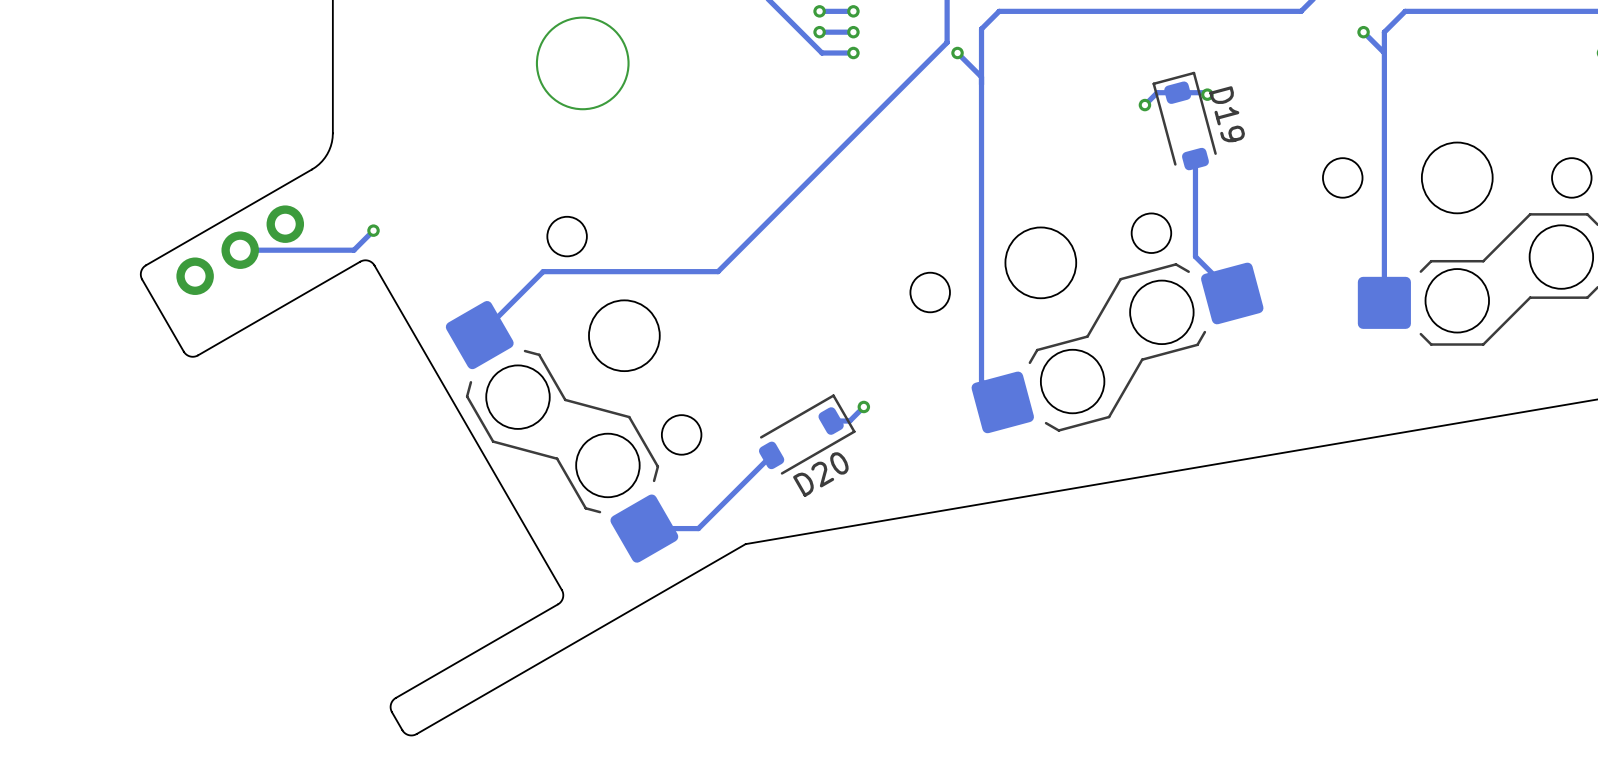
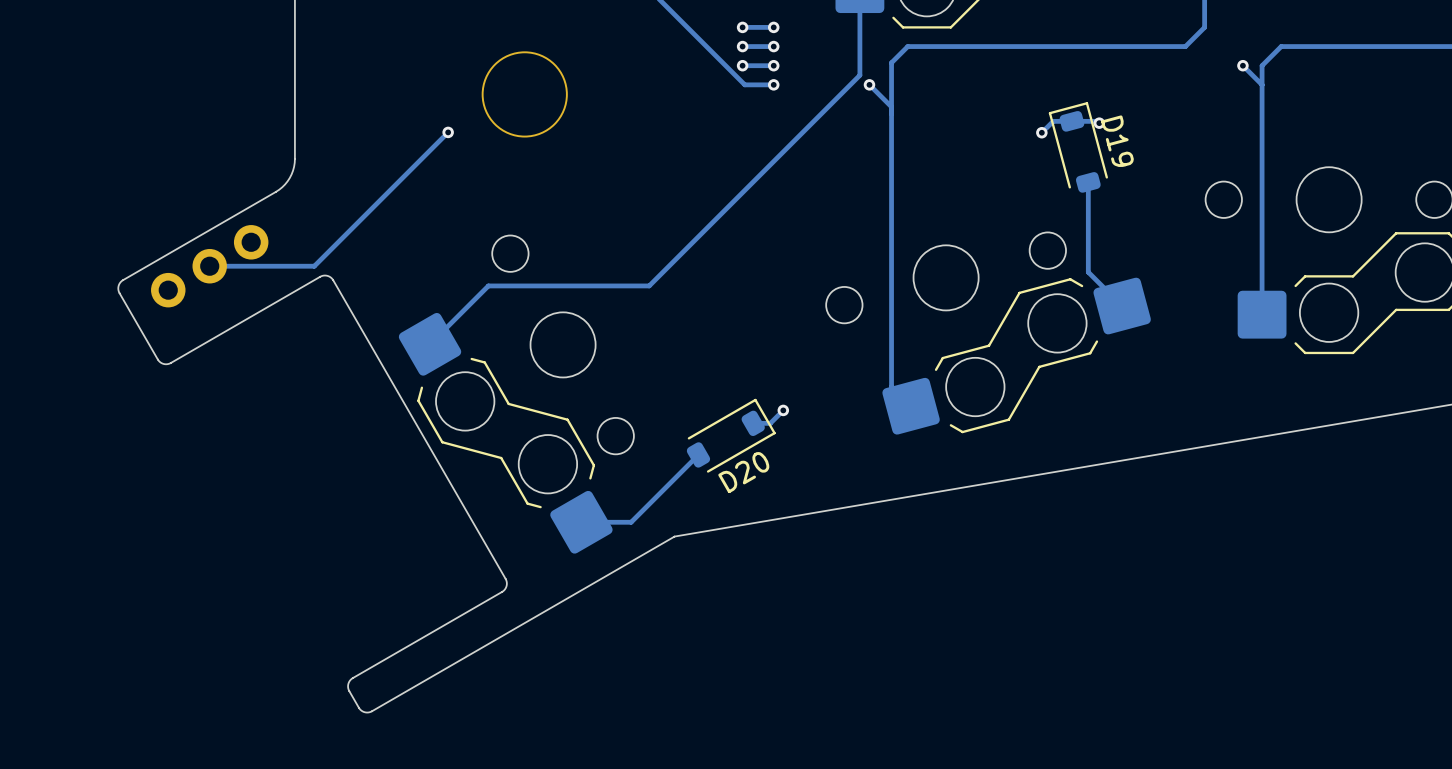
via: none -> (448, 132)
track: (373, 230) (353, 250) -> (448, 132) (314, 266)
via: (373, 230) -> none

